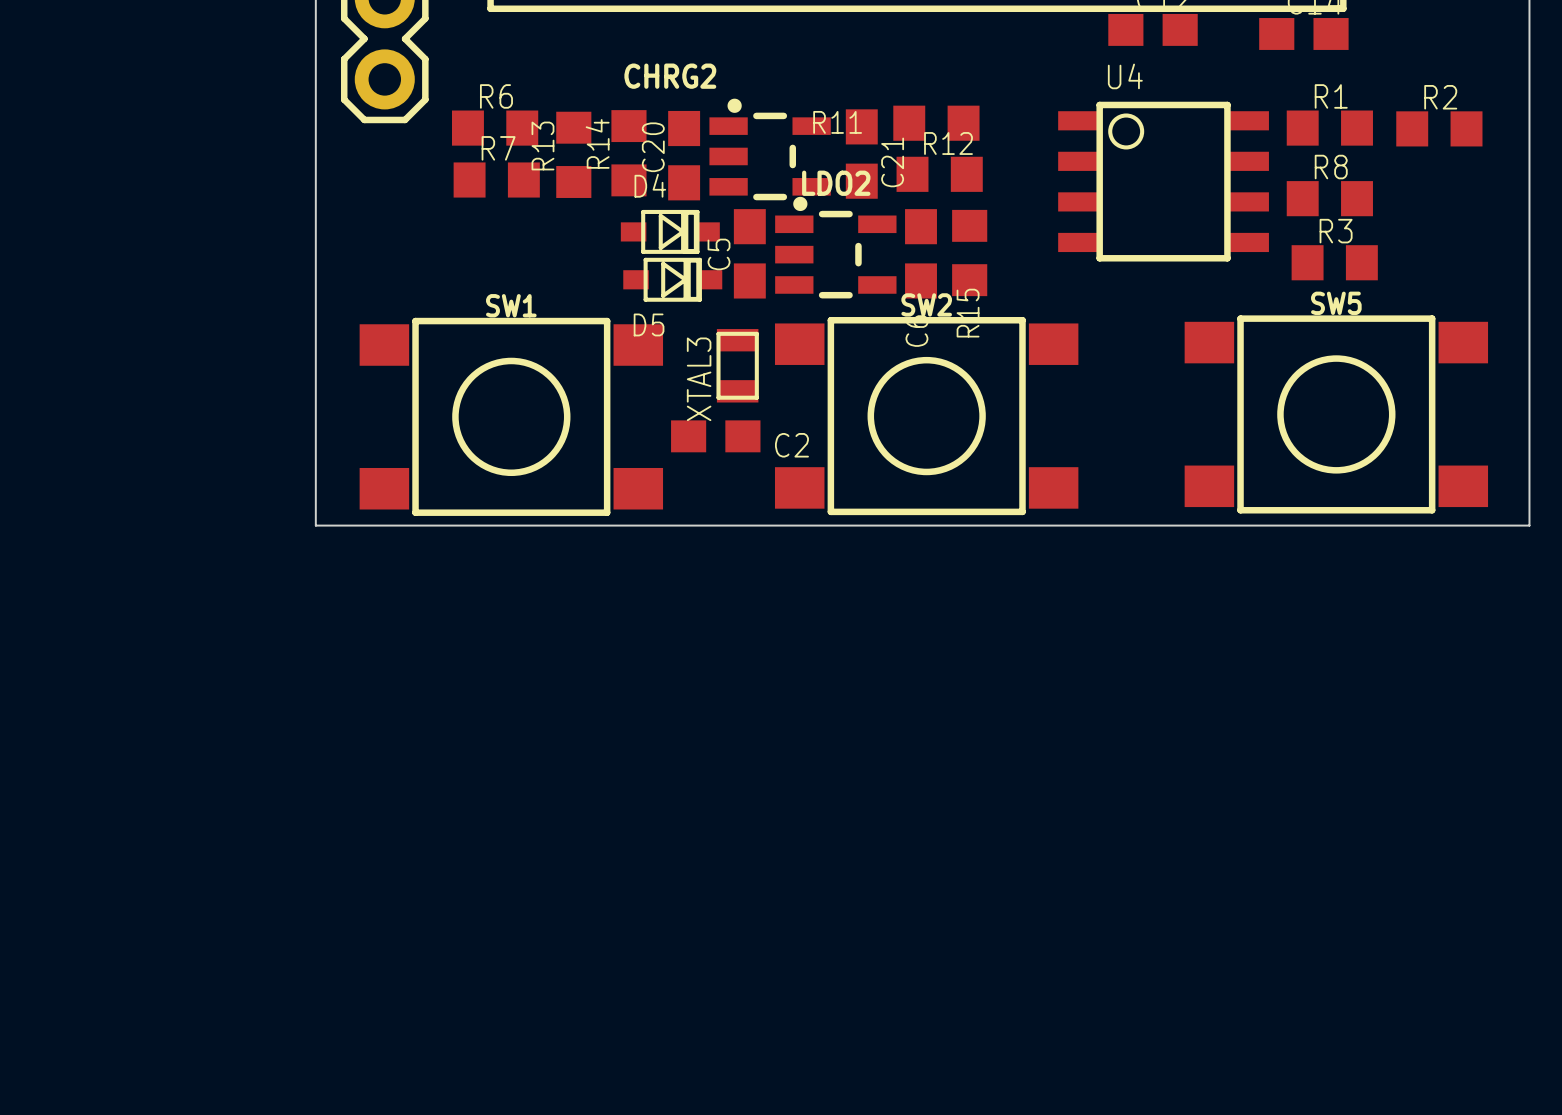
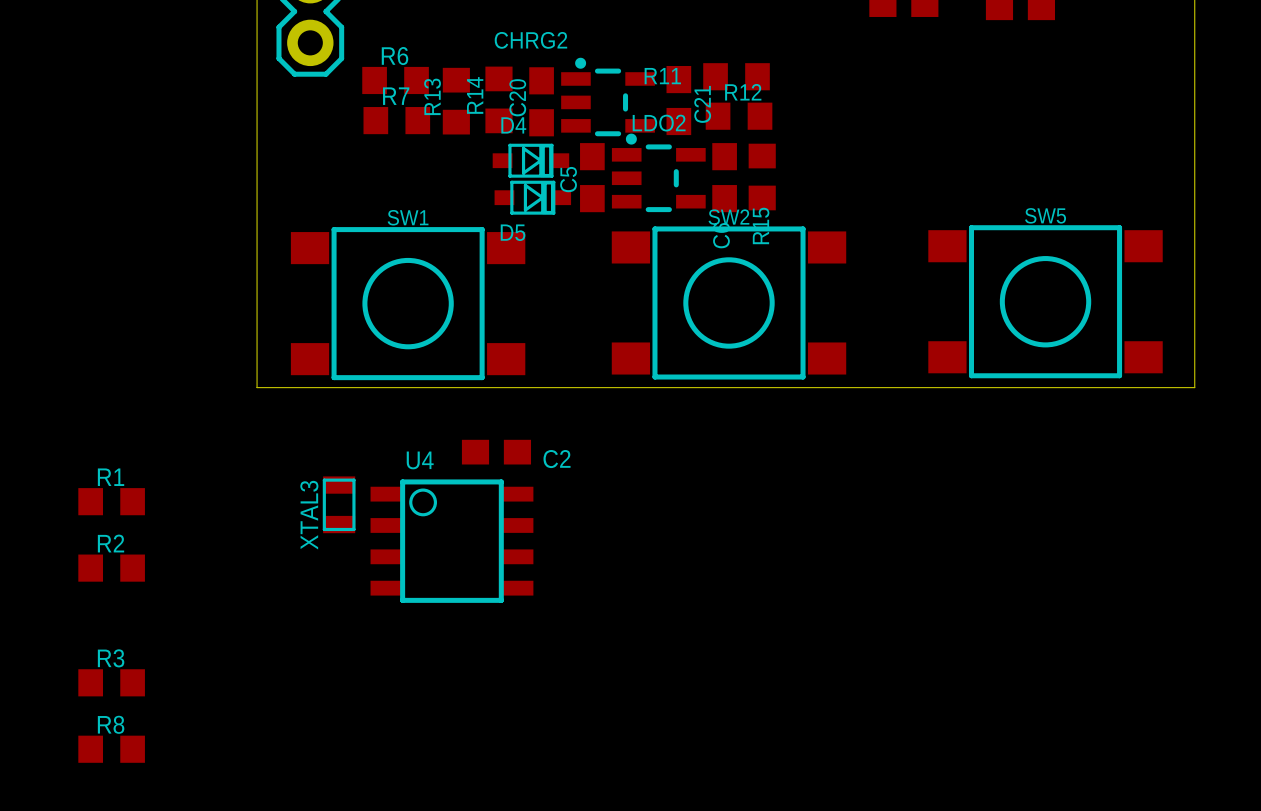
R1 position: (1329, 128) -> (111, 501)
R2 position: (1439, 128) -> (111, 568)
U4 position: (1163, 181) -> (451, 541)
R8 position: (1329, 198) -> (111, 749)
R3 position: (1334, 262) -> (111, 682)
XTAL3 position: (737, 365) -> (339, 504)
C2 position: (715, 436) -> (496, 452)

